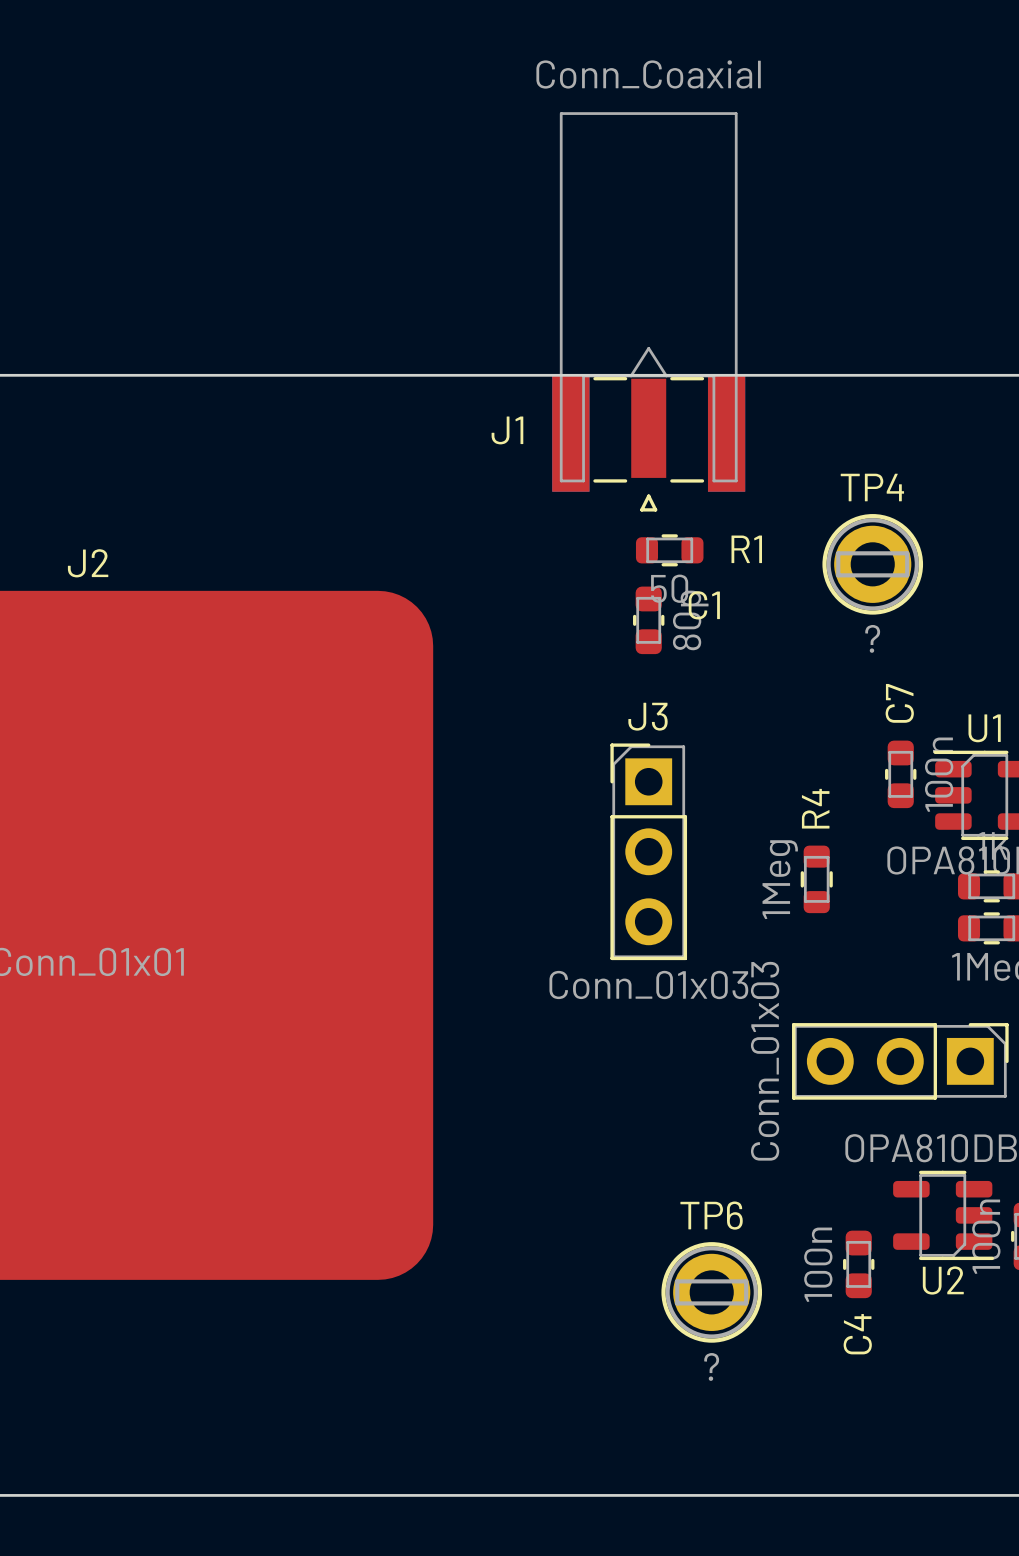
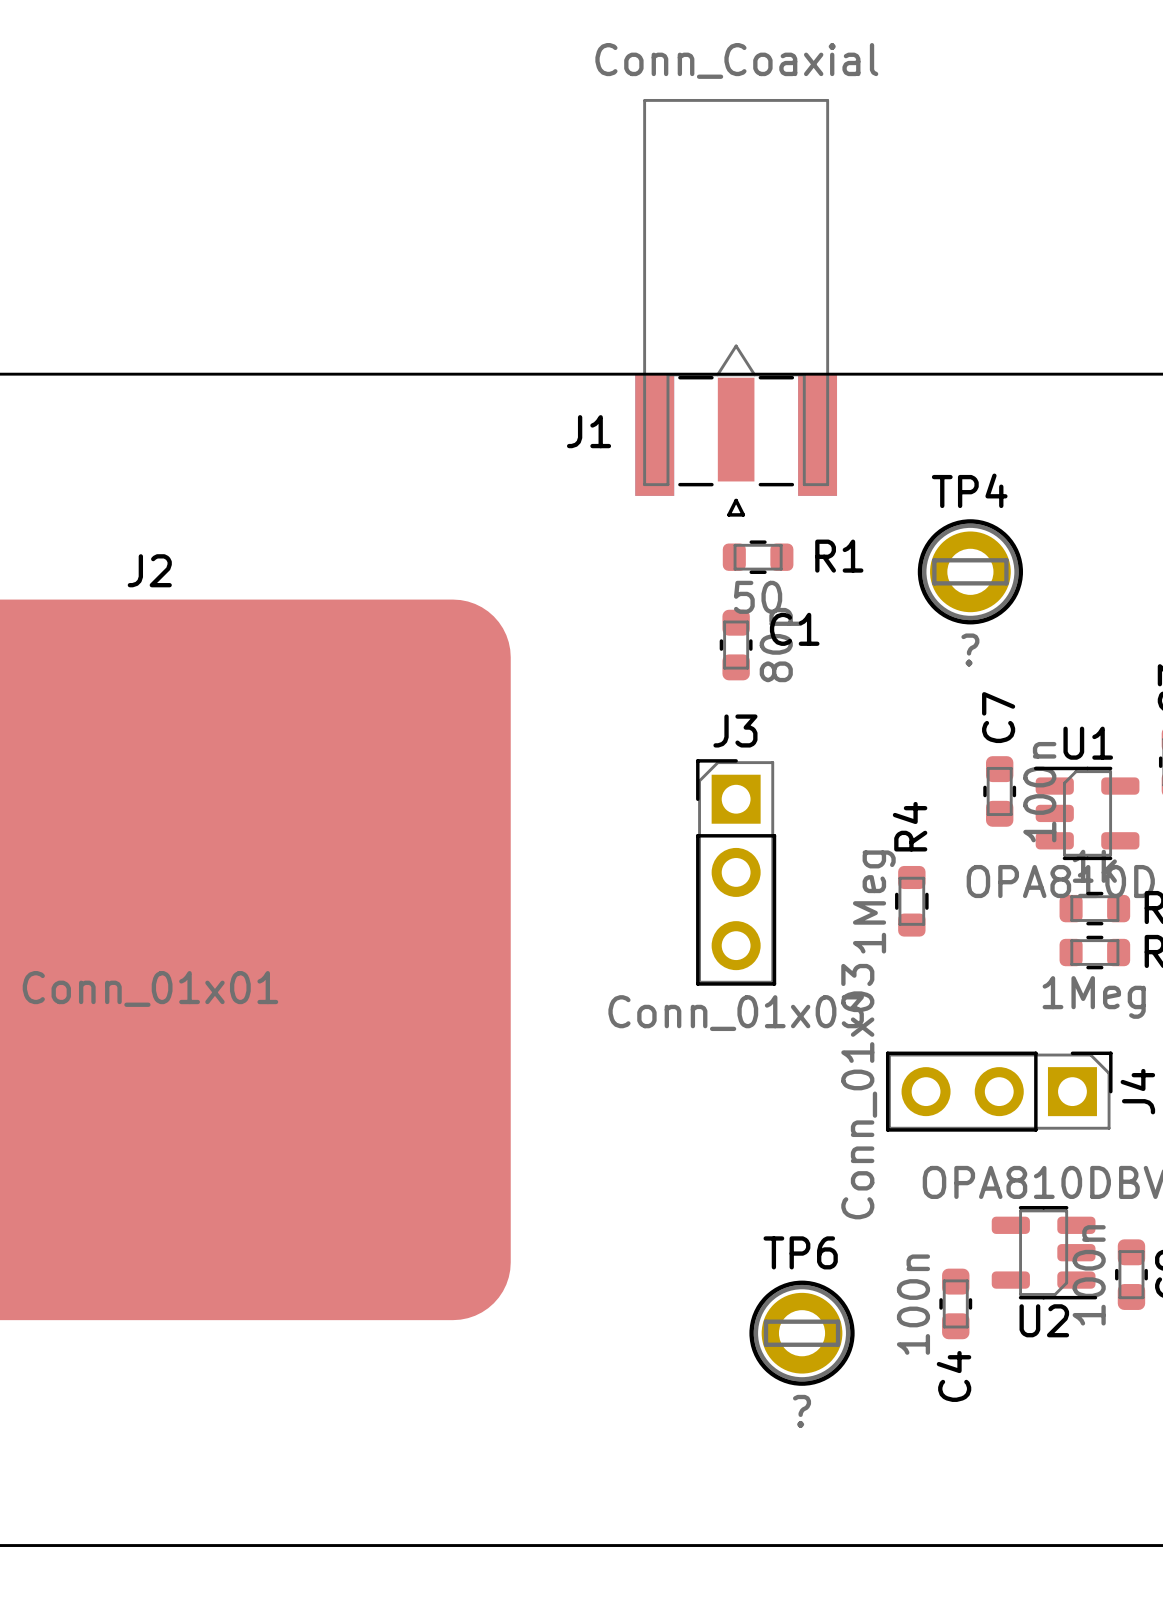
C1 position: (648, 620) -> (736, 645)

